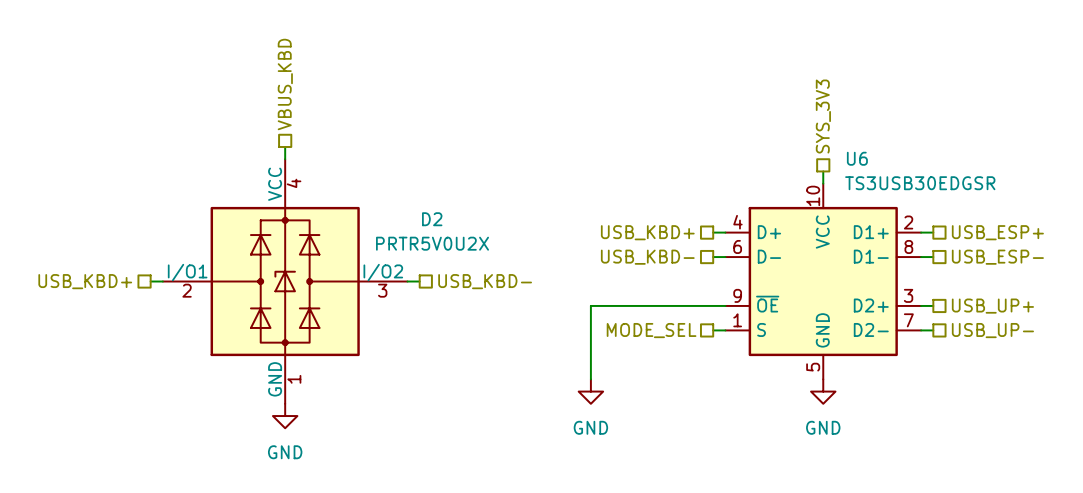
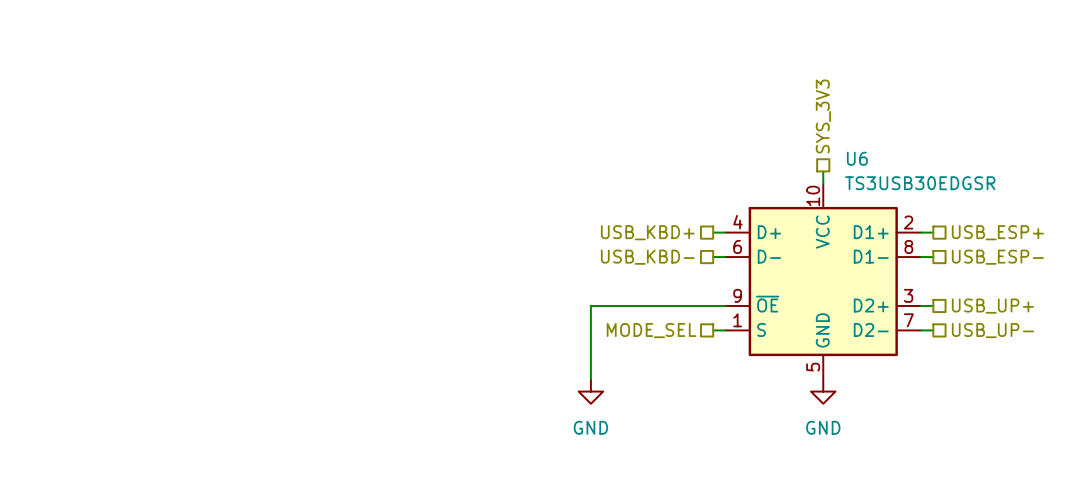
hierarchical label: VBUS_KBD (285, 84) -> none
wire: (285, 146) (285, 159) -> none
hierarchical label: USB_KBD+ (85, 281) -> none
wire: (150, 281) (162, 281) -> none
D2: PRTR5V0U2X (285, 281) -> none
wire: (407, 281) (419, 281) -> none
hierarchical label: USB_KBD- (485, 281) -> none
power symbol: GND (285, 416) -> none

